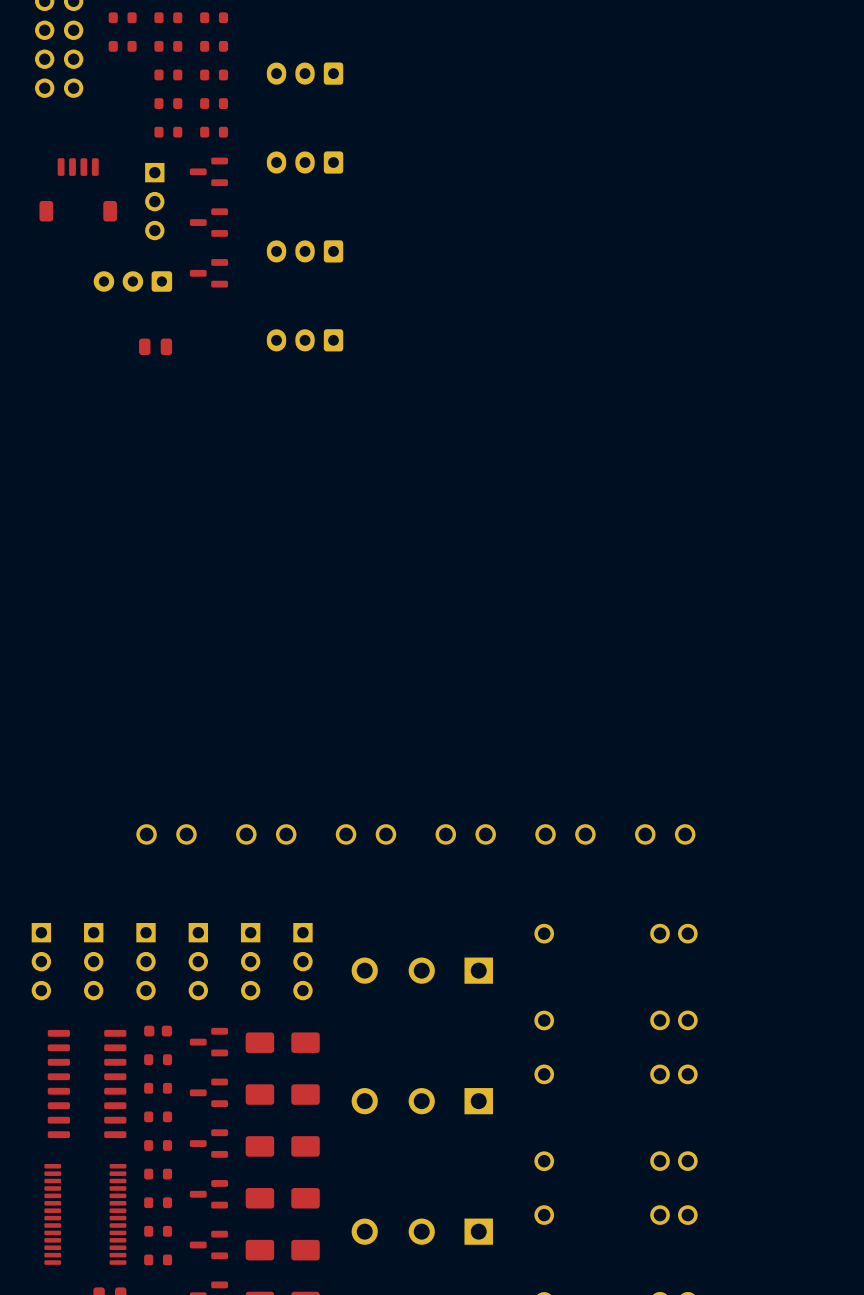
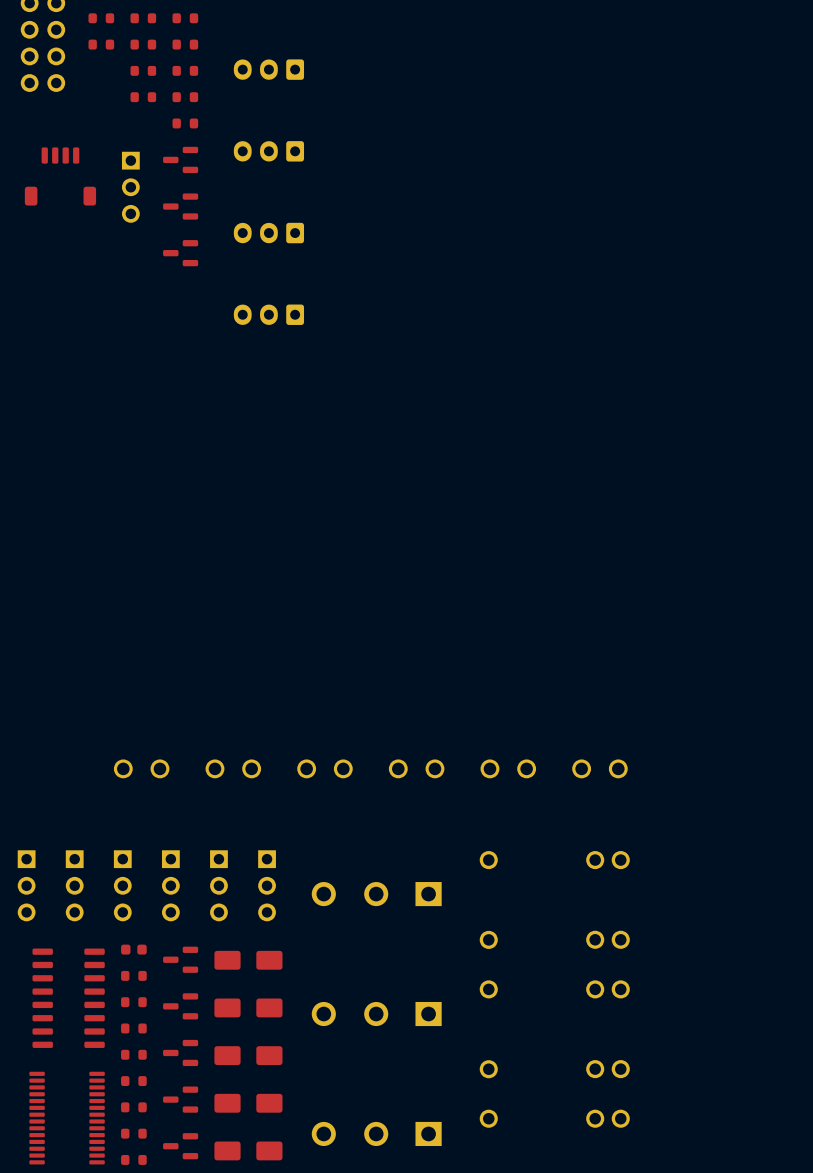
part: (168, 132) -> none
part: (132, 281) -> none
part: (155, 346) -> none

